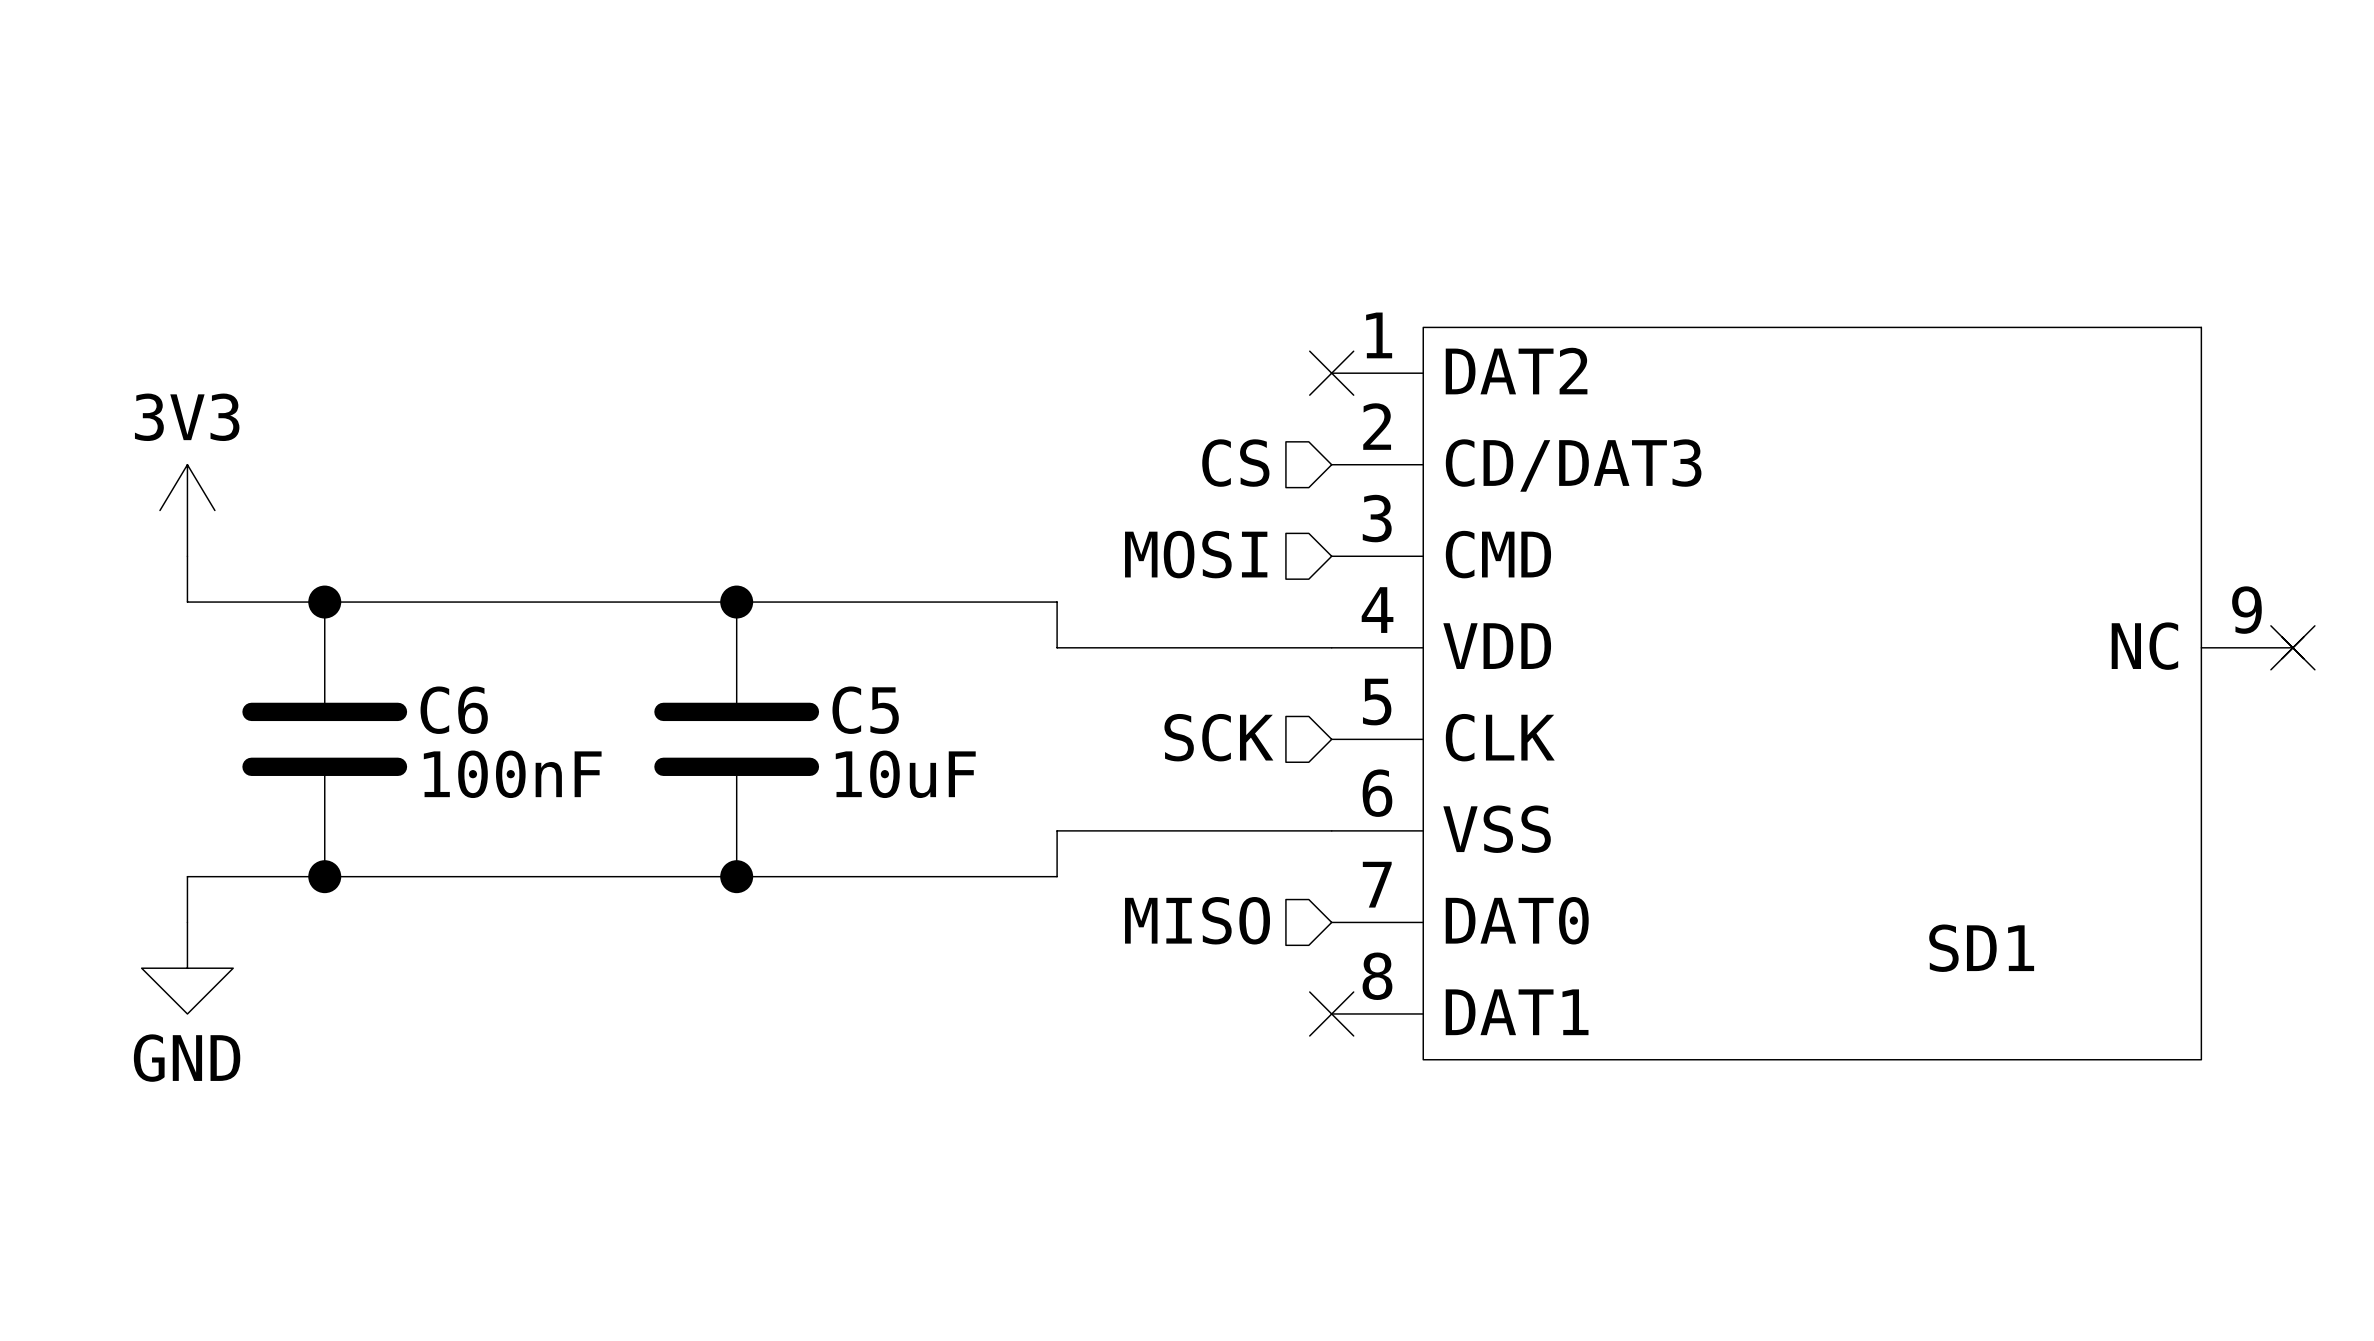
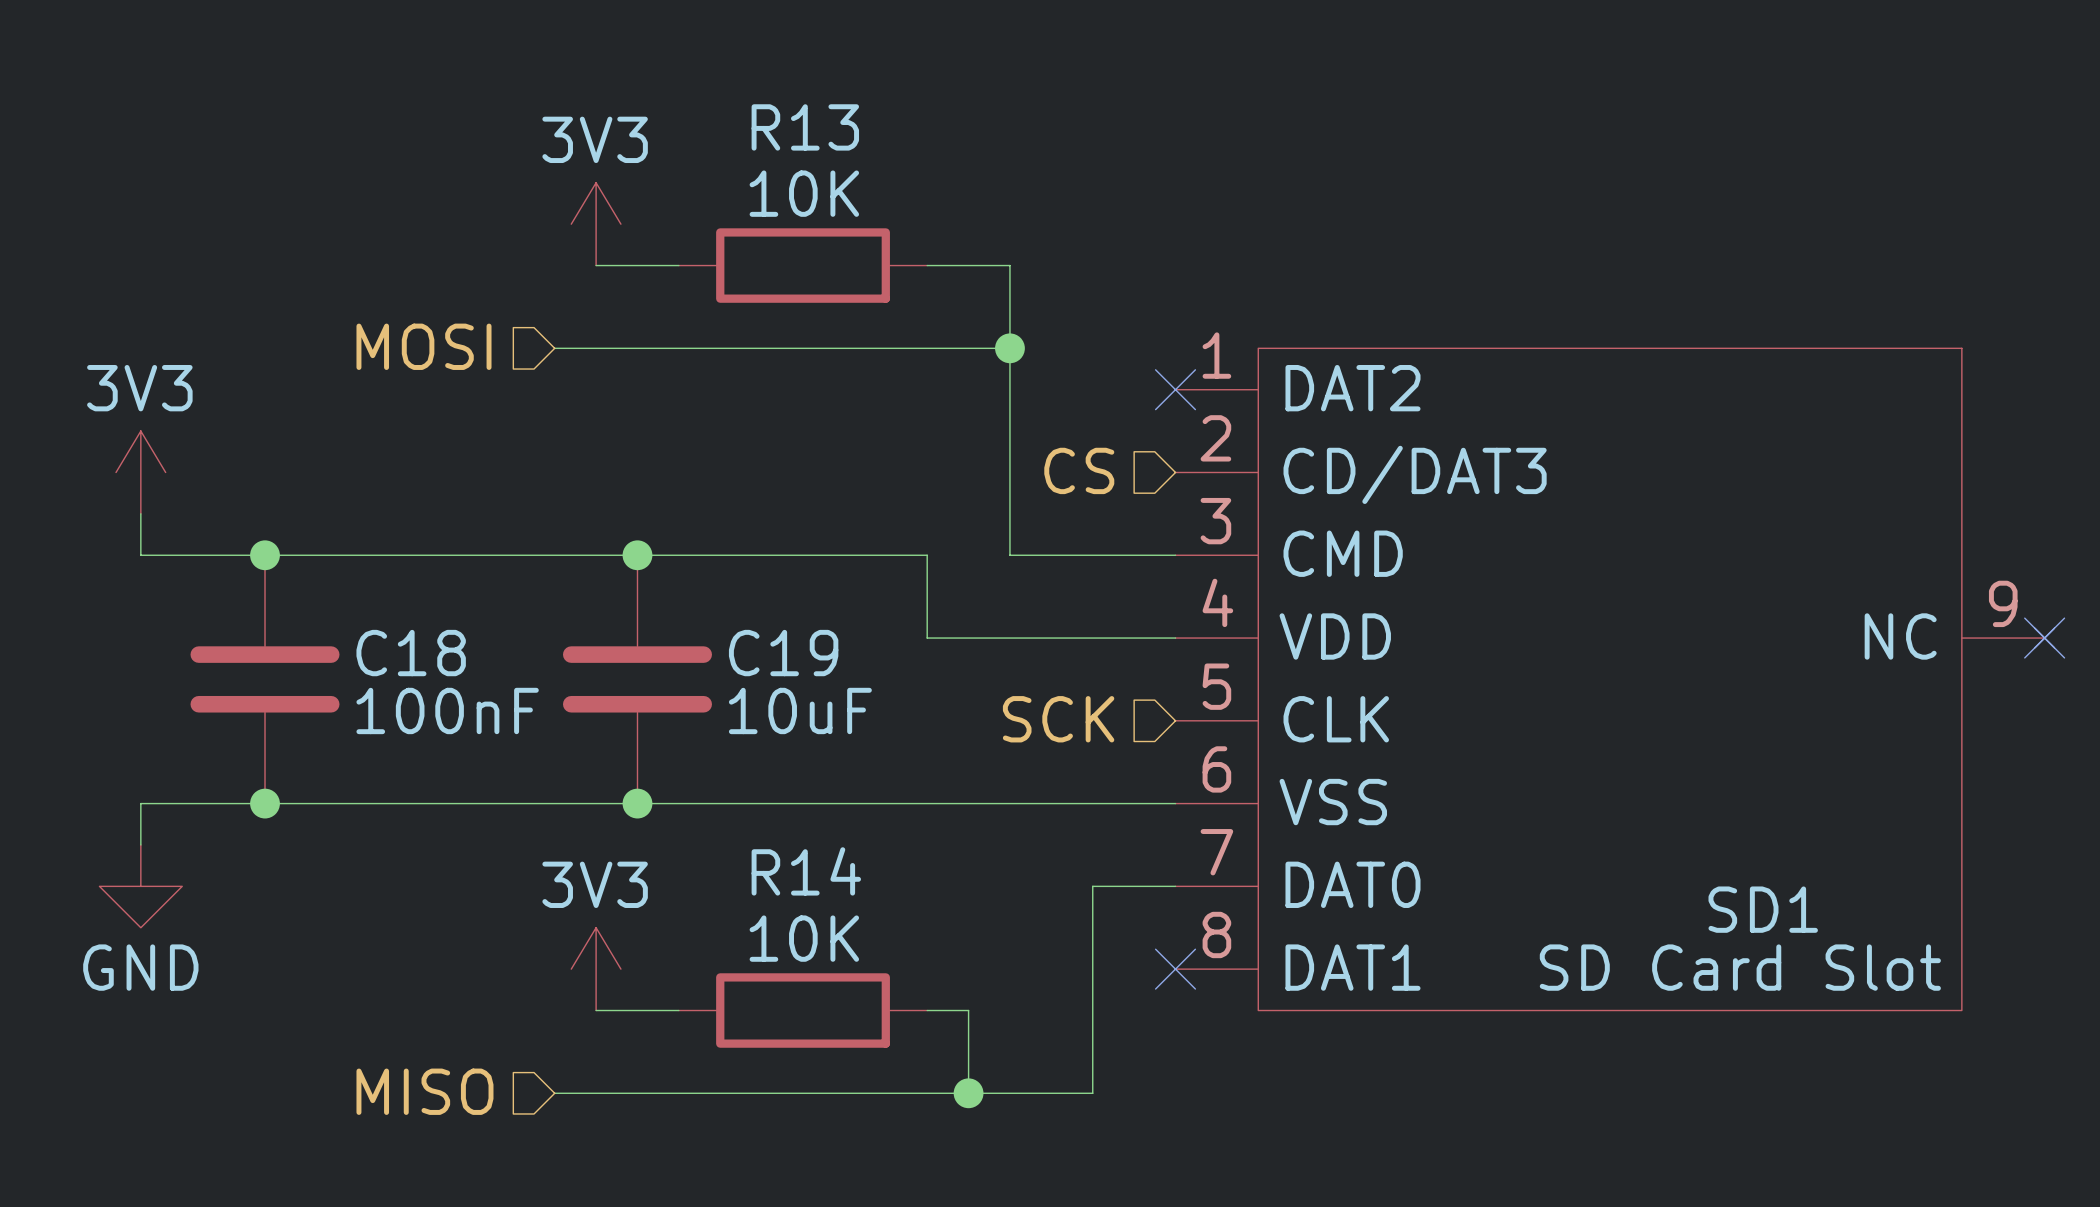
power symbol: none -> 3V3 (596, 224)
wire: none -> (596, 265) (678, 265)
R13: none -> 10K (803, 265)
wire: none -> (927, 265) (1009, 265) (1009, 555) (1175, 555)
wire: none -> (554, 348) (1009, 348)
junction: none -> (1009, 348)
no-connect mark position: (1331, 373) -> (1175, 389)
hierarchical label position: CS (1235, 463) -> CS (1079, 470)
hierarchical label position: MOSI (1196, 554) -> MOSI (423, 346)
wire: (1057, 647) (1331, 647) -> (927, 596) (927, 638) (1175, 638)
no-connect mark position: (2292, 647) -> (2044, 638)
SD1 position: (1817, 693) -> (1614, 679)
C6 name: C6 (454, 710) -> C18 (411, 653)
C5 name: C5 (865, 710) -> C19 (783, 653)
hierarchical label position: SCK (1218, 737) -> SCK (1058, 719)
wire: (1331, 830) (1057, 830) (1057, 876) -> (1175, 803) (927, 803)
hierarchical label position: MISO (1197, 920) -> MISO (424, 1091)
wire: none -> (1175, 886) (1092, 886) (1092, 1093) (554, 1093)
no-connect mark position: (1331, 1013) -> (1175, 969)
SD1 value: none -> SD Card Slot (1740, 967)
power symbol: none -> 3V3 (596, 969)
wire: none -> (596, 1010) (678, 1010)
R14: none -> 10K (803, 1010)
wire: none -> (927, 1010) (968, 1010) (968, 1093)
junction: none -> (968, 1093)

